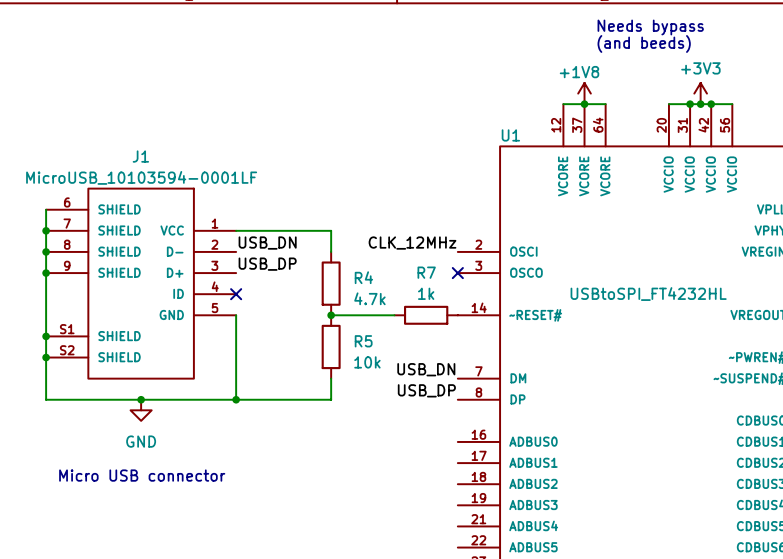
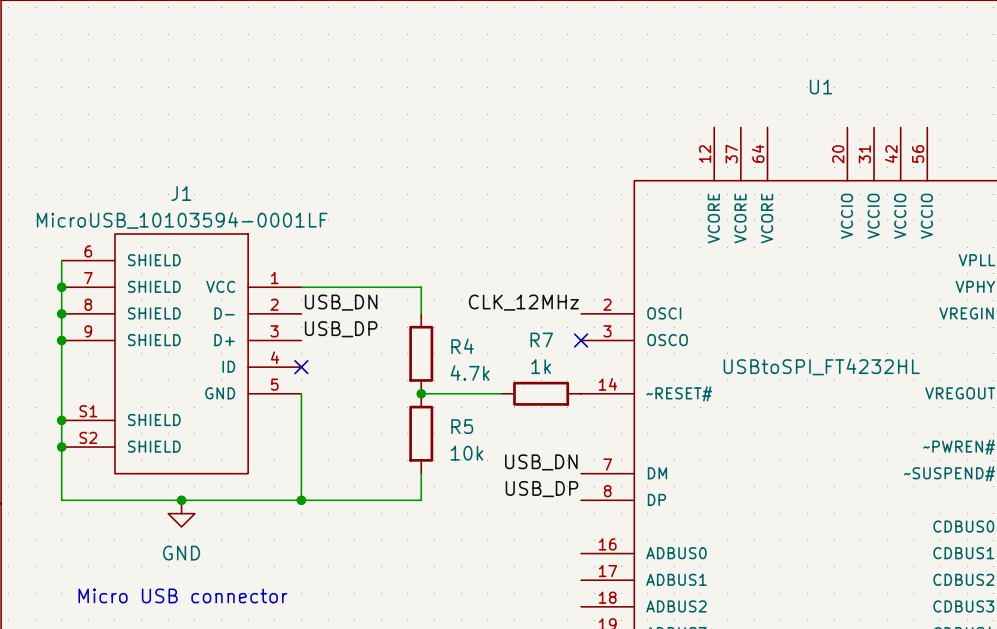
text: Needs bypass (650, 27) -> none
text: (and beeds) (644, 43) -> none
power symbol: +1V8 (584, 93) -> none
power symbol: +3V3 (700, 93) -> none
wire: (563, 104) (605, 104) -> none
junction: (584, 104) -> none
wire: (668, 104) (732, 104) -> none
junction: (690, 104) -> none
junction: (700, 104) -> none
junction: (711, 104) -> none
U1 name position: U1 (510, 135) -> U1 (821, 86)

